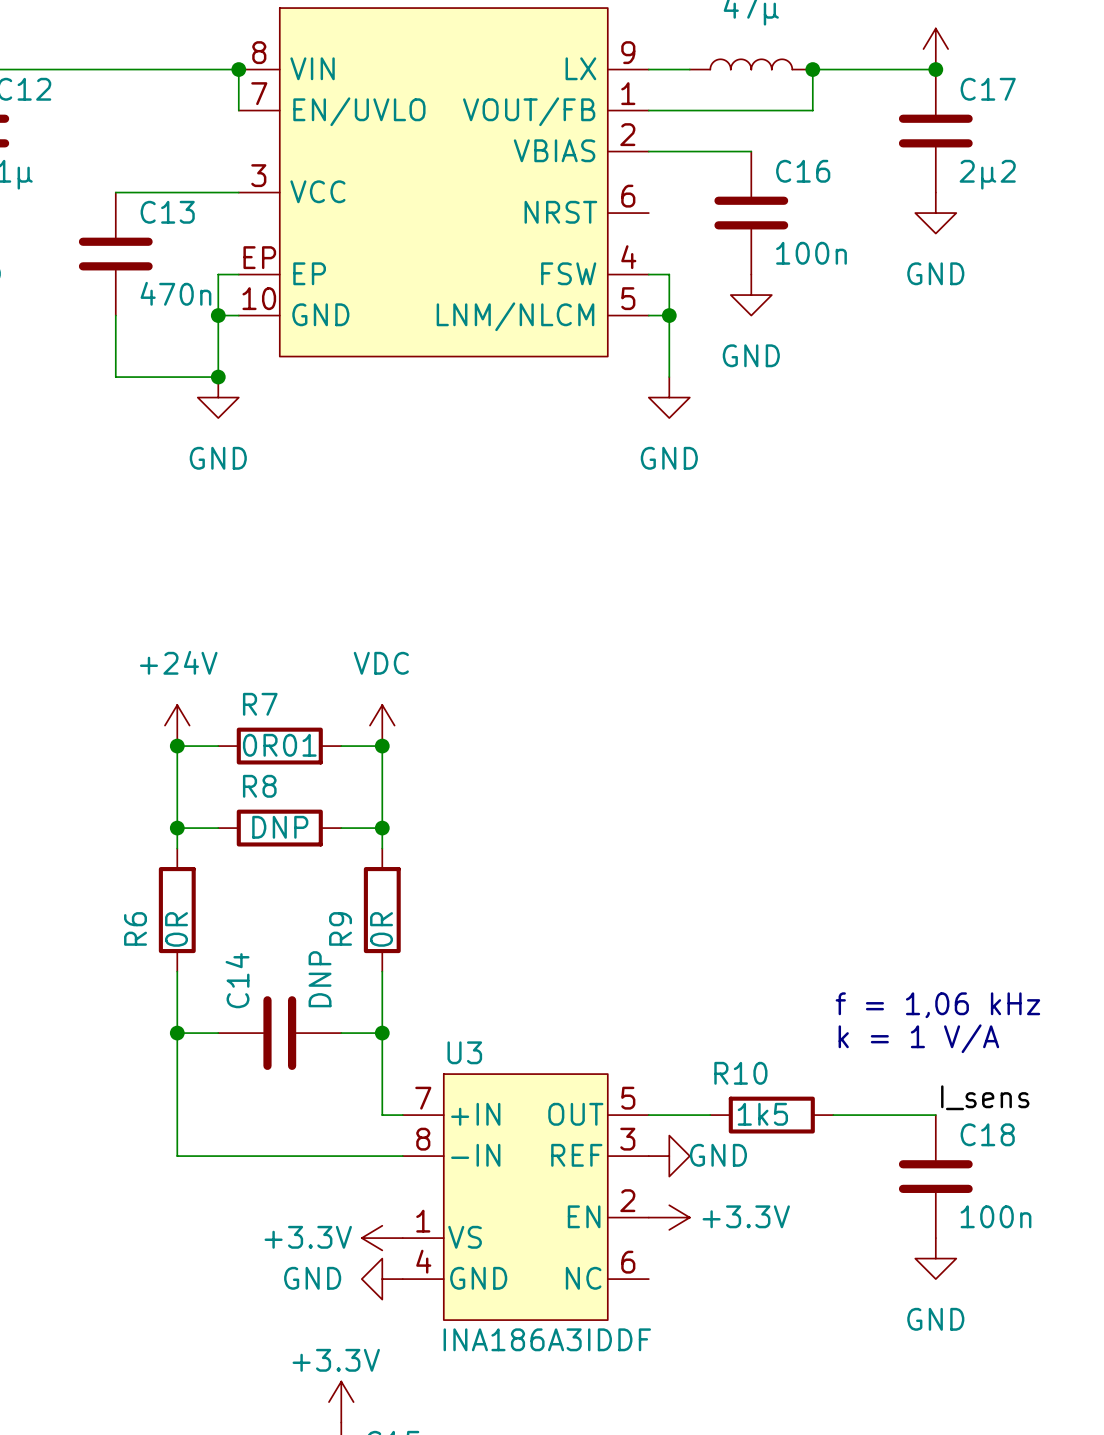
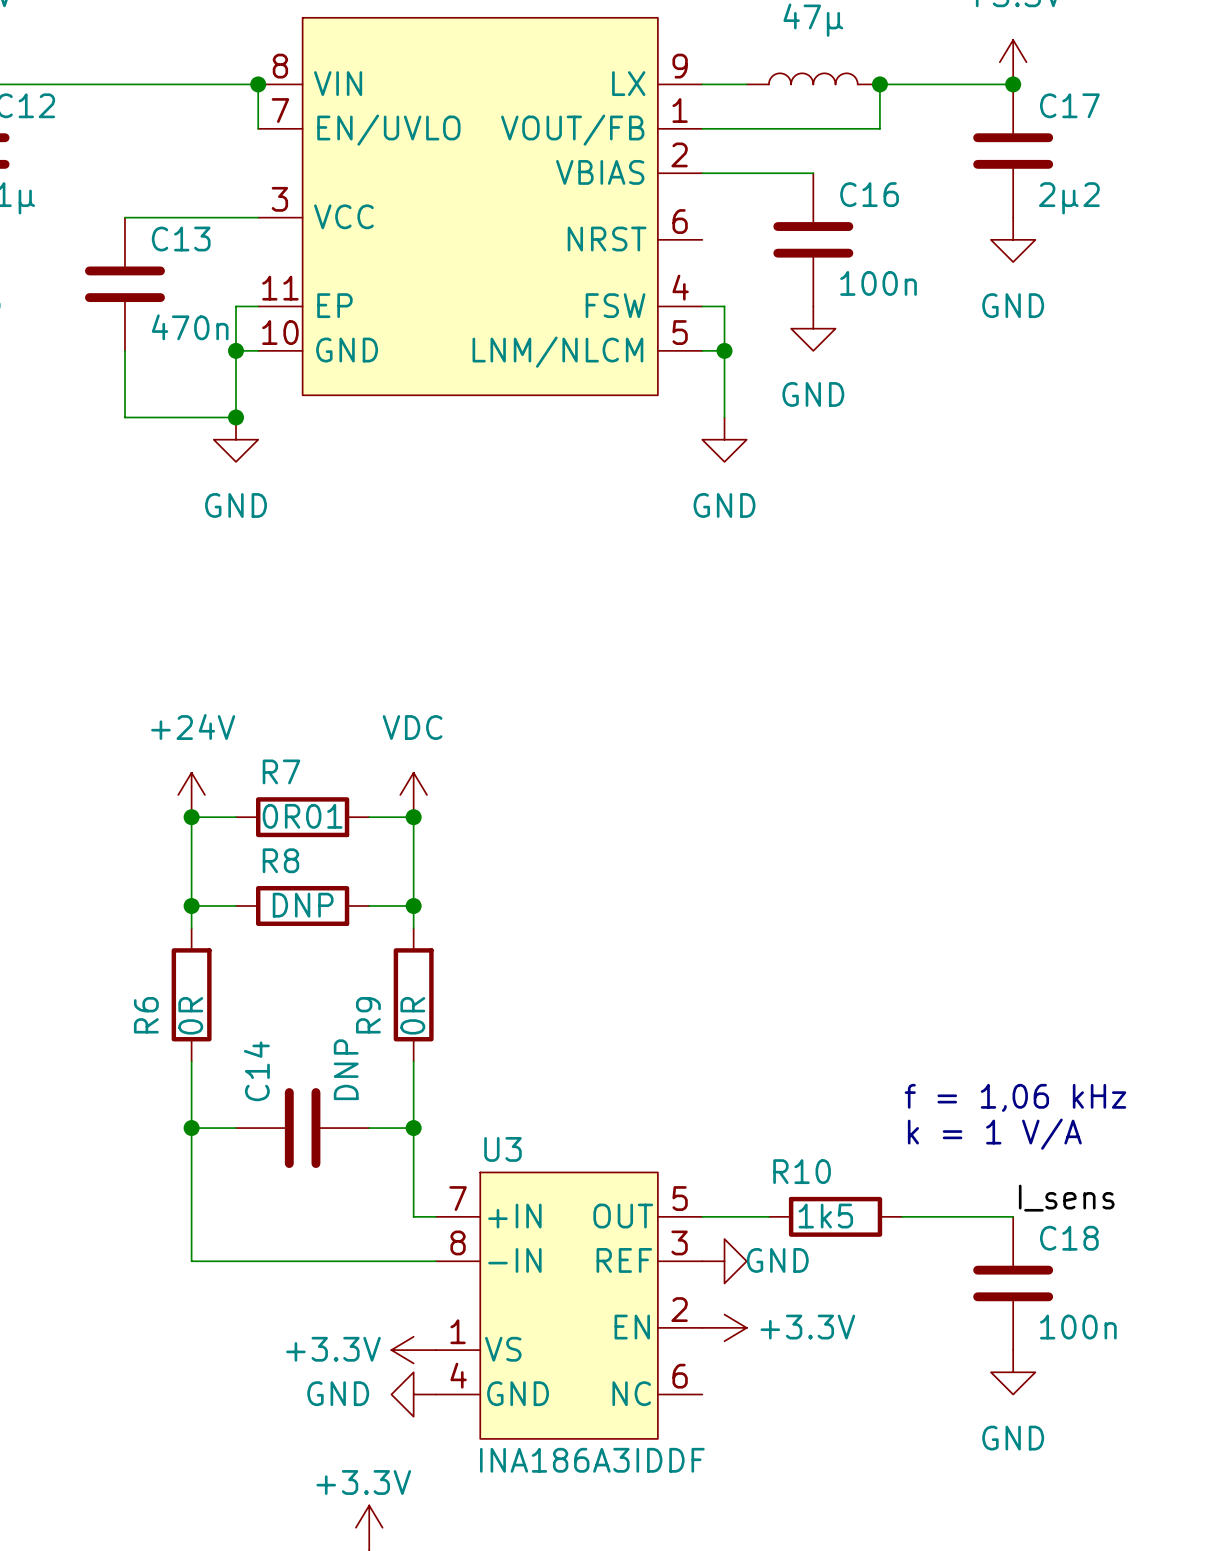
part pin number: EP (259, 257) -> 11 (280, 288)

